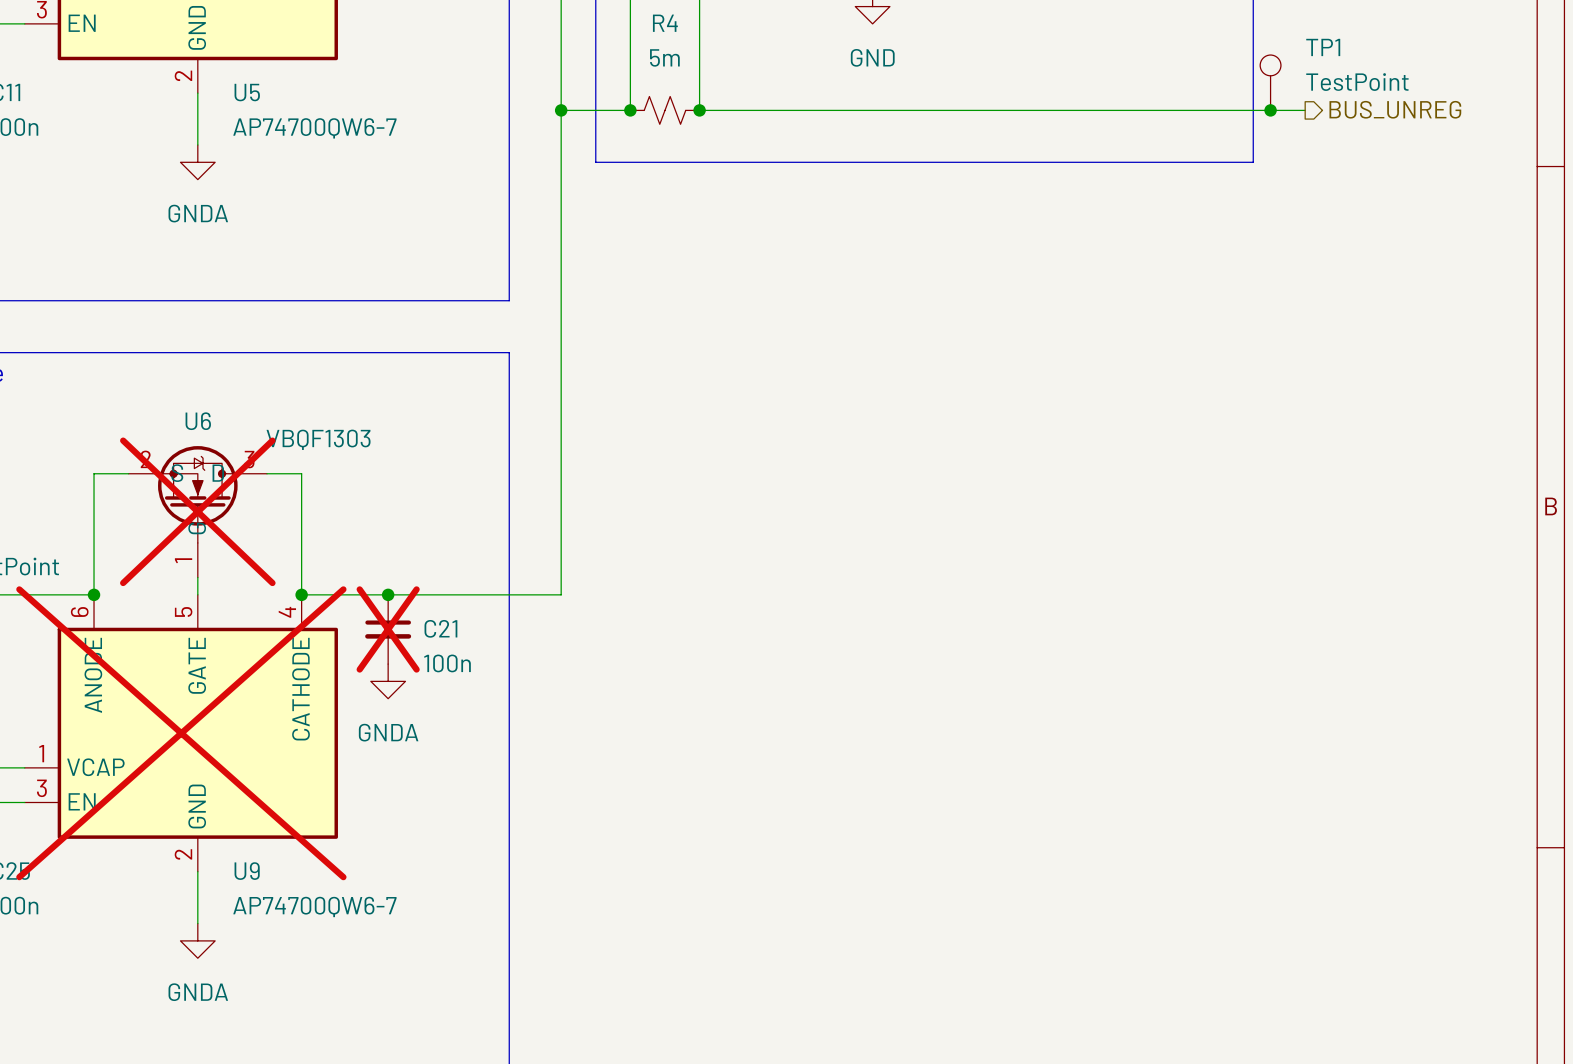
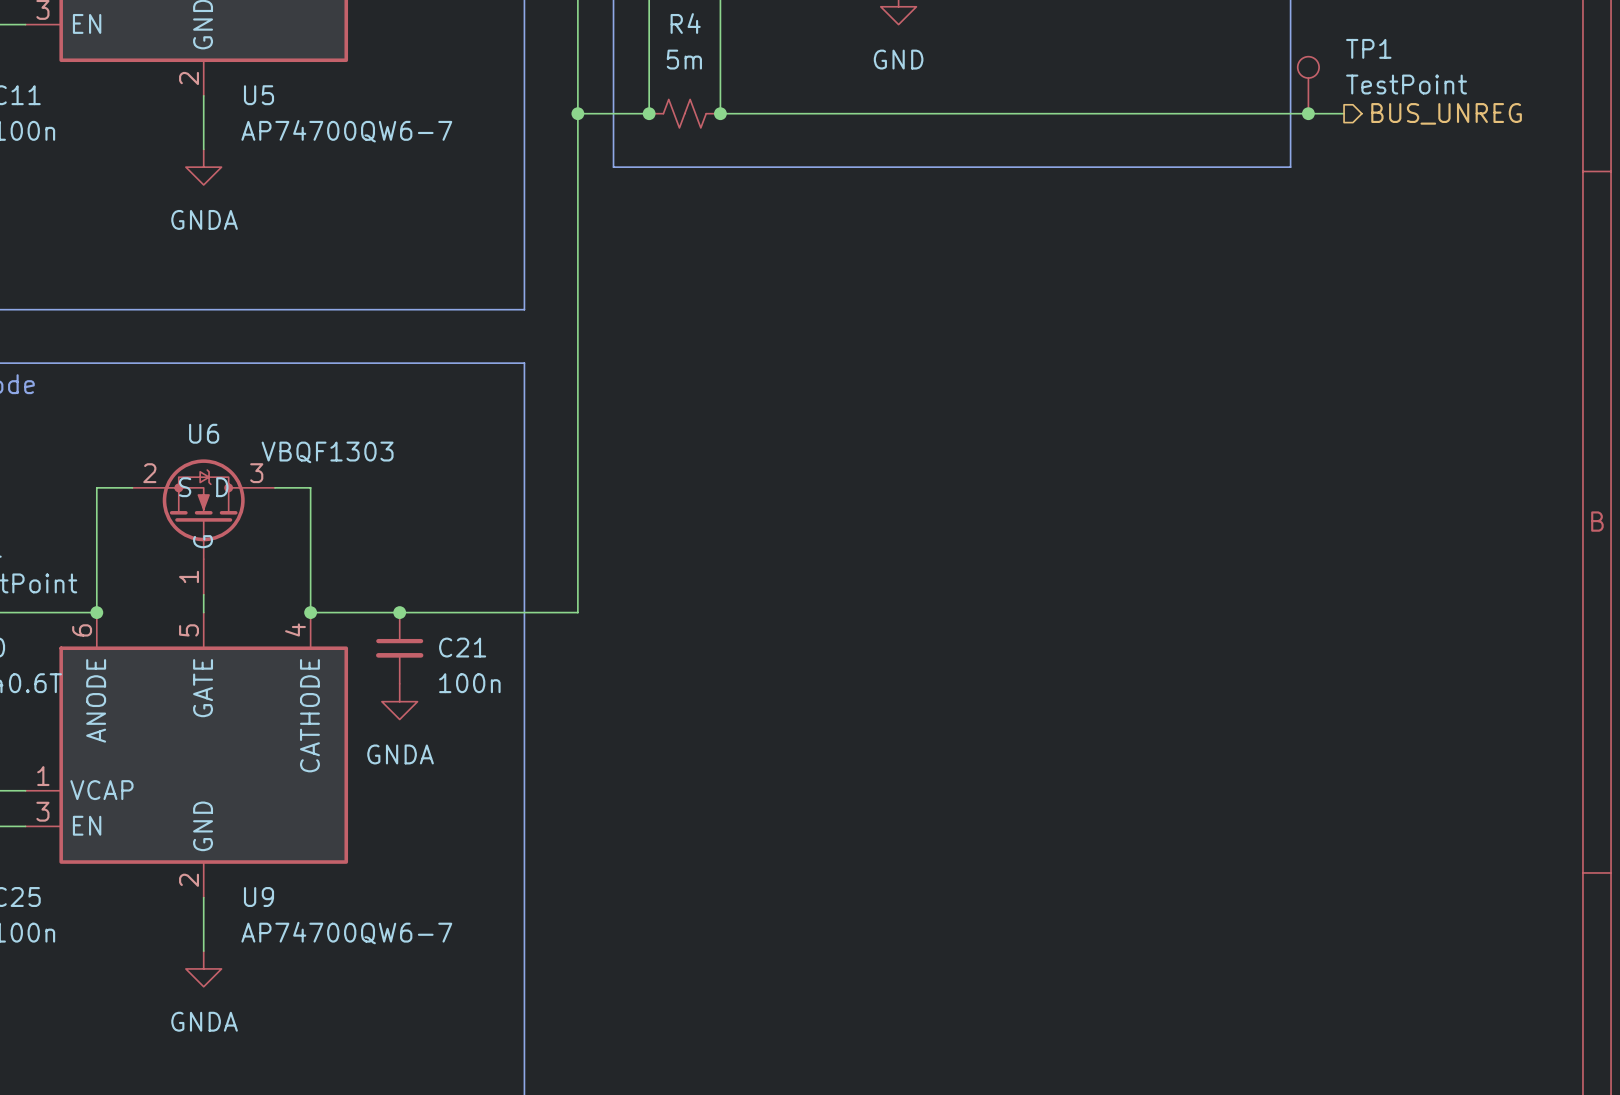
U6 do-not-place cross: (197, 511) -> none
C21 do-not-place cross: (388, 629) -> none
U9 do-not-place cross: (181, 733) -> none

